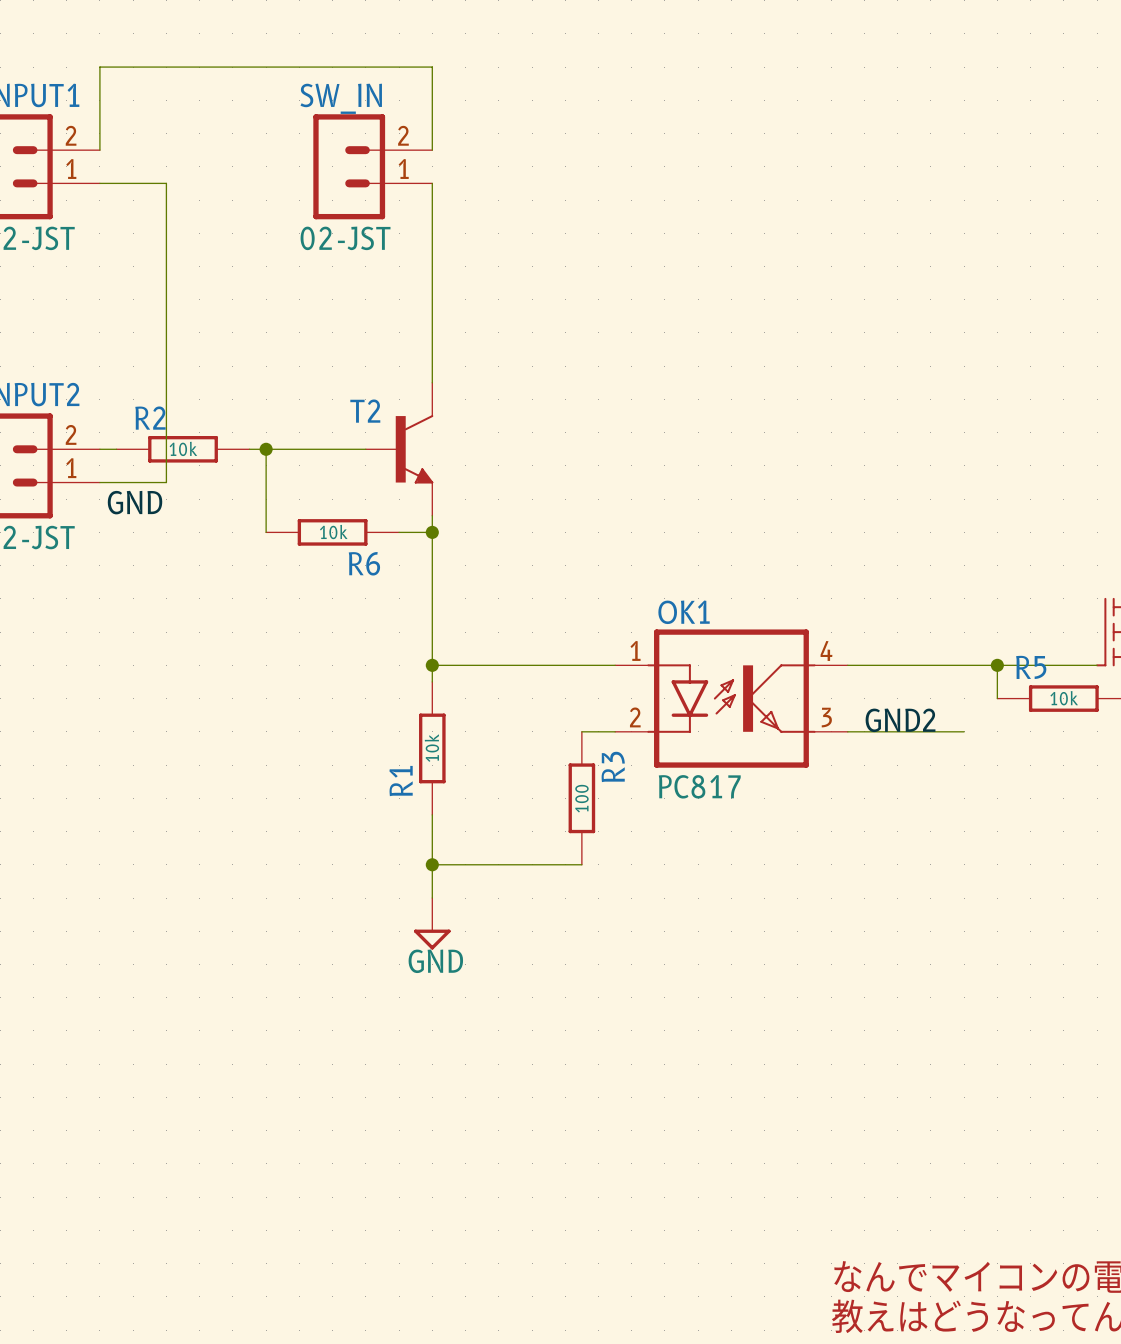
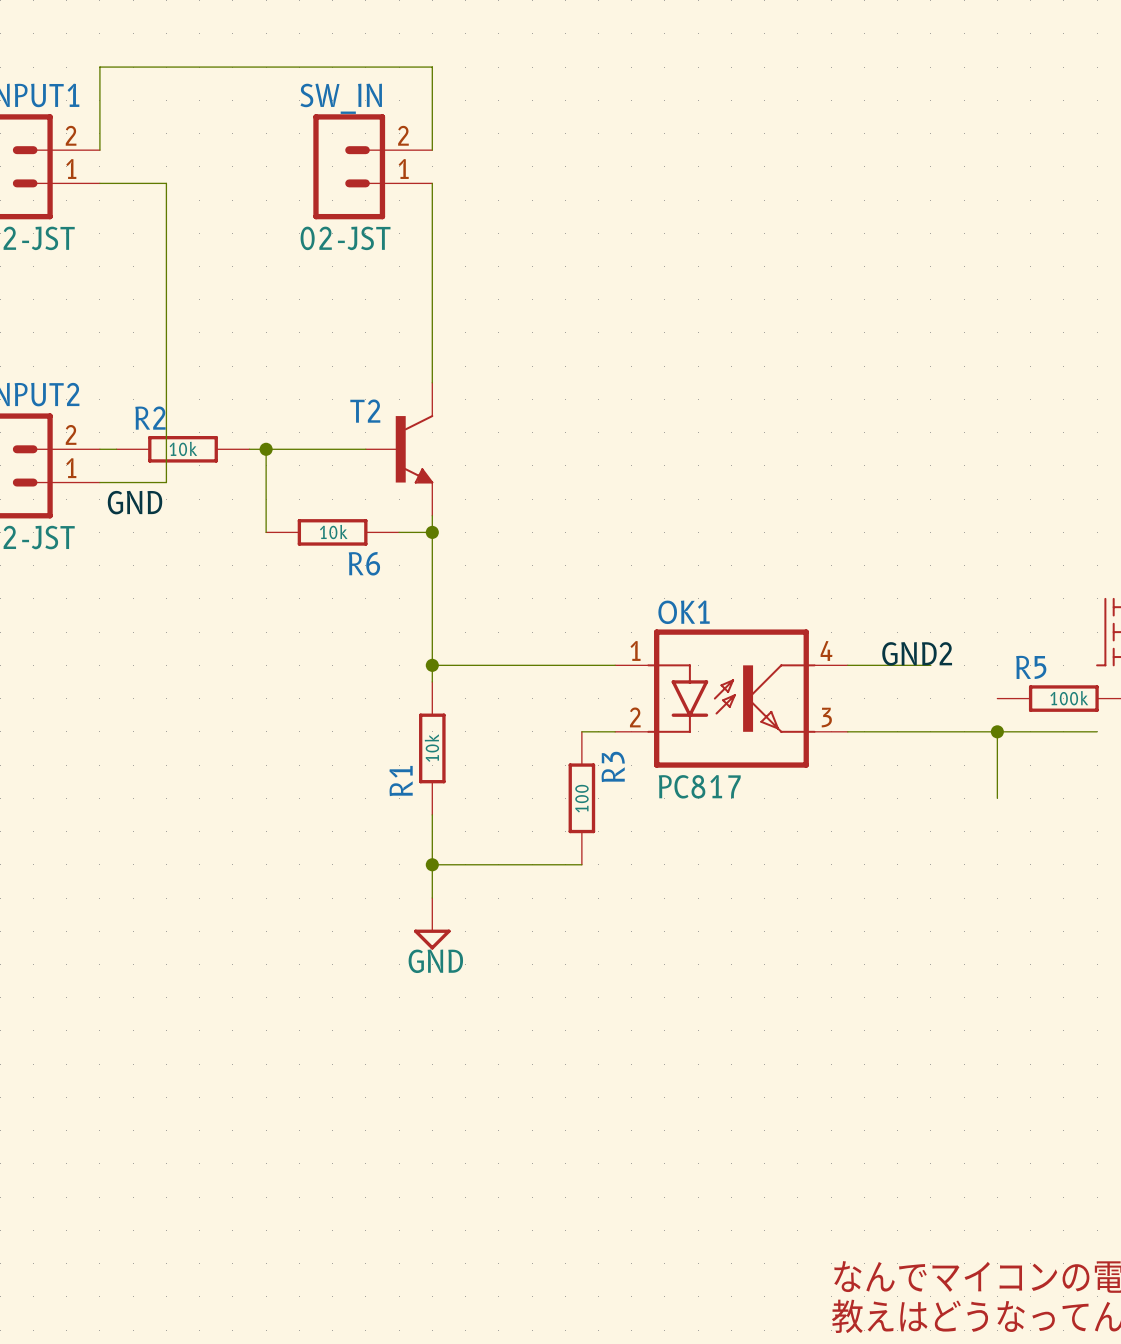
wire: (930, 665) (1097, 665) -> none
wire: (997, 665) (997, 698) -> none
junction position: (997, 665) -> (997, 731)
R5 value: 10k (1064, 698) -> 100k (1069, 698)
label position: GND2 (900, 720) -> GND2 (917, 653)
wire: none -> (964, 731) (1097, 731)
wire: none -> (997, 731) (997, 798)

